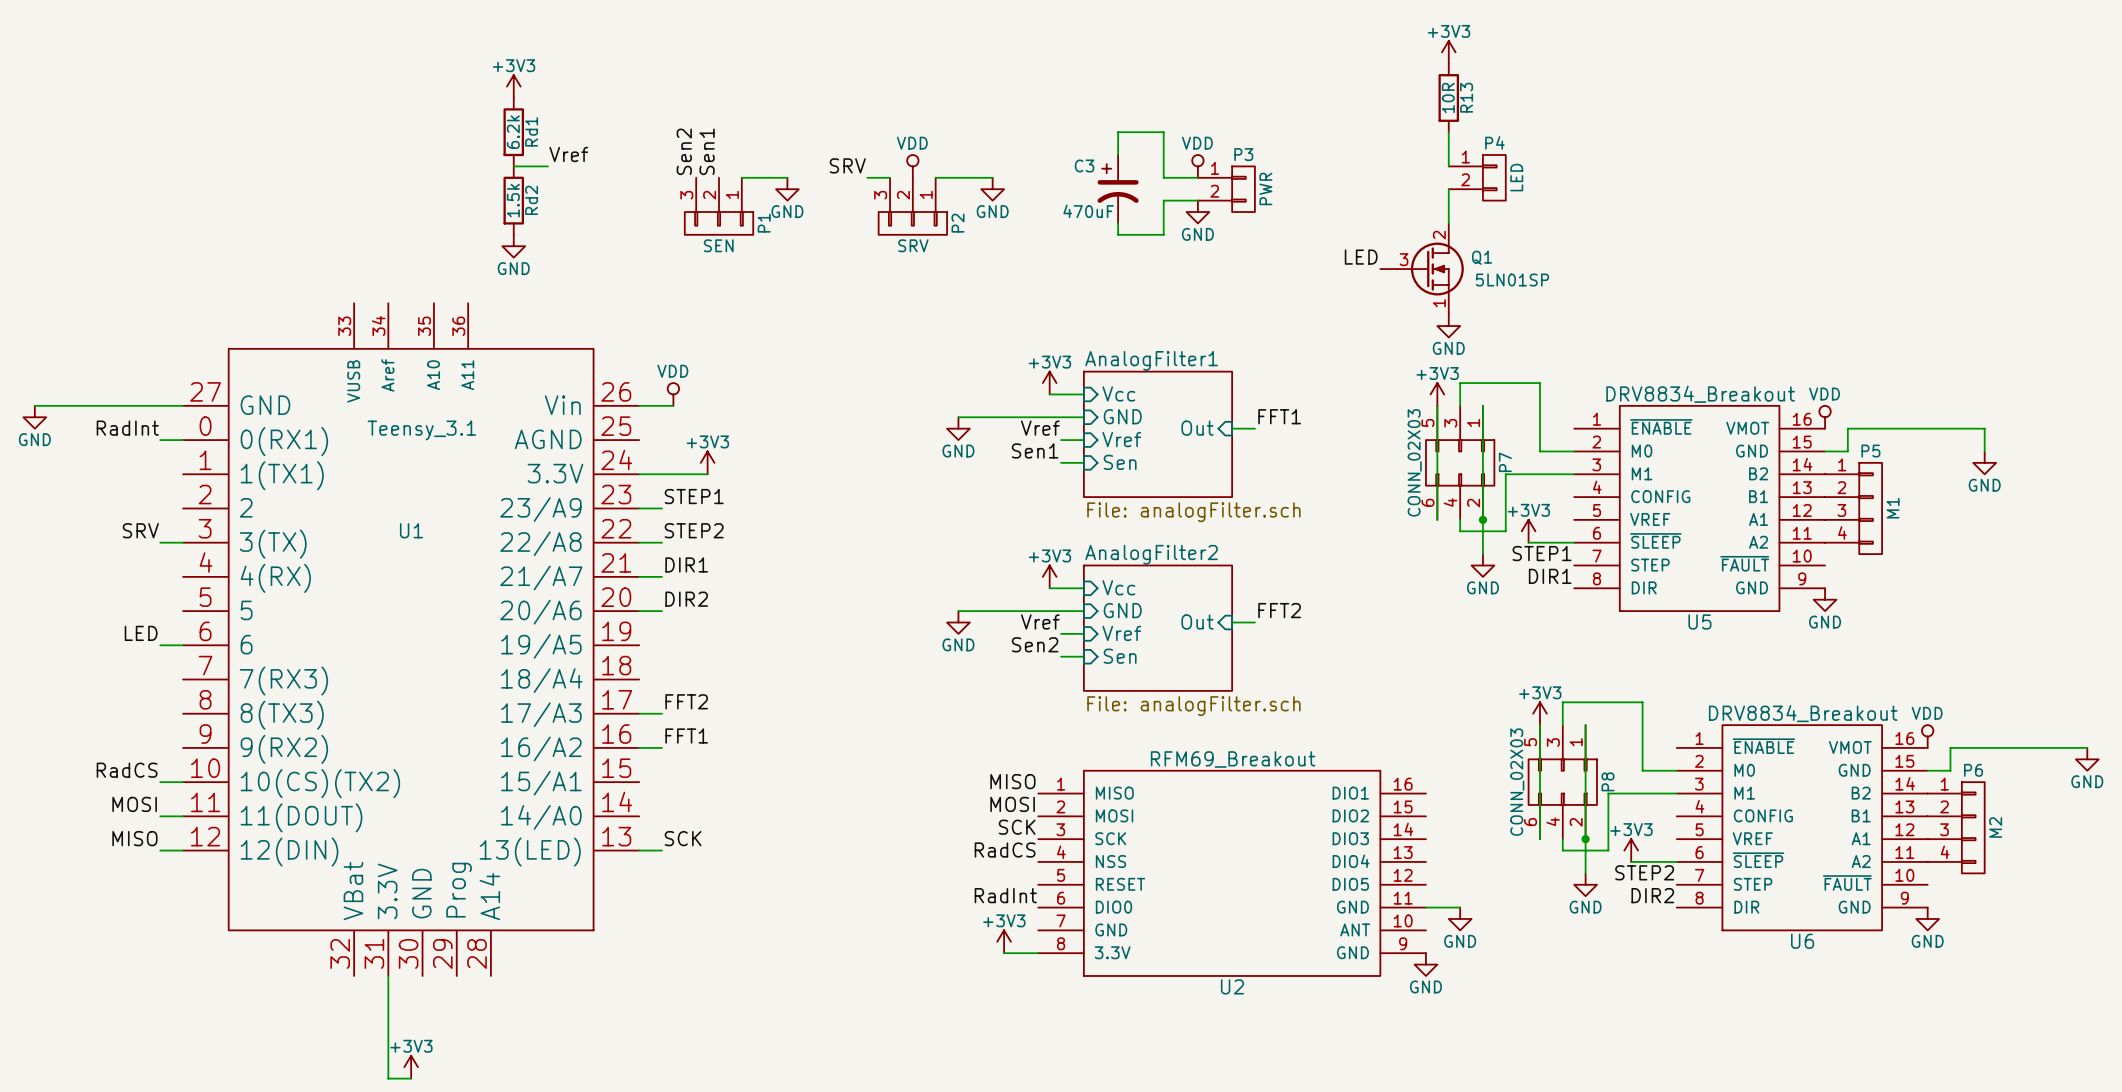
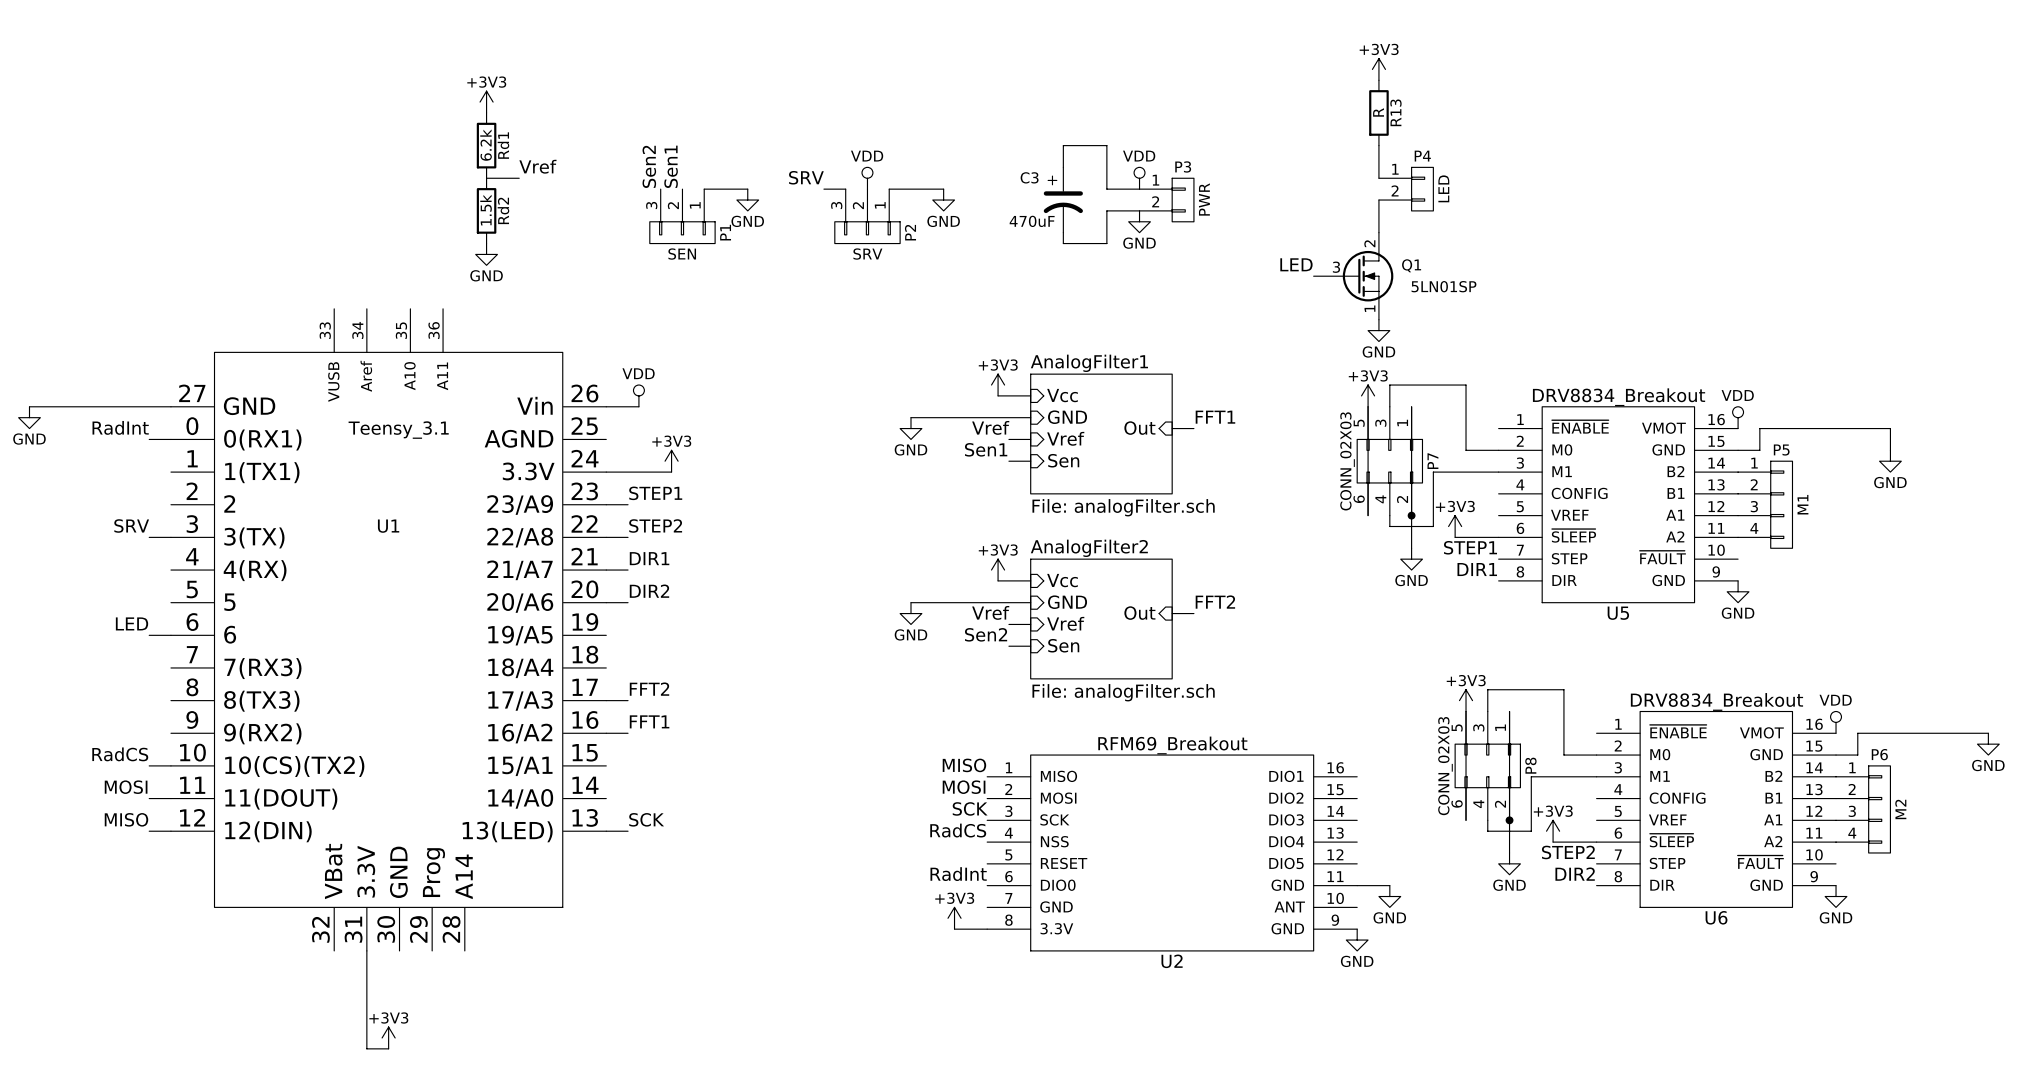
R13 value: 10R (1448, 97) -> R (1378, 112)

